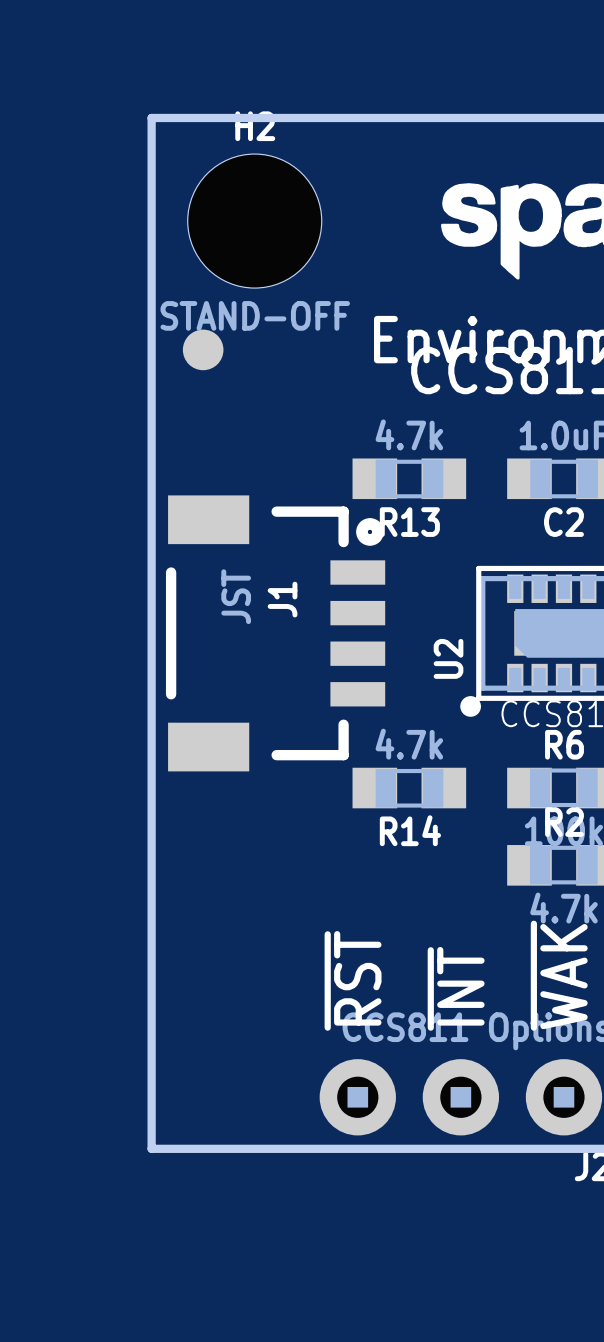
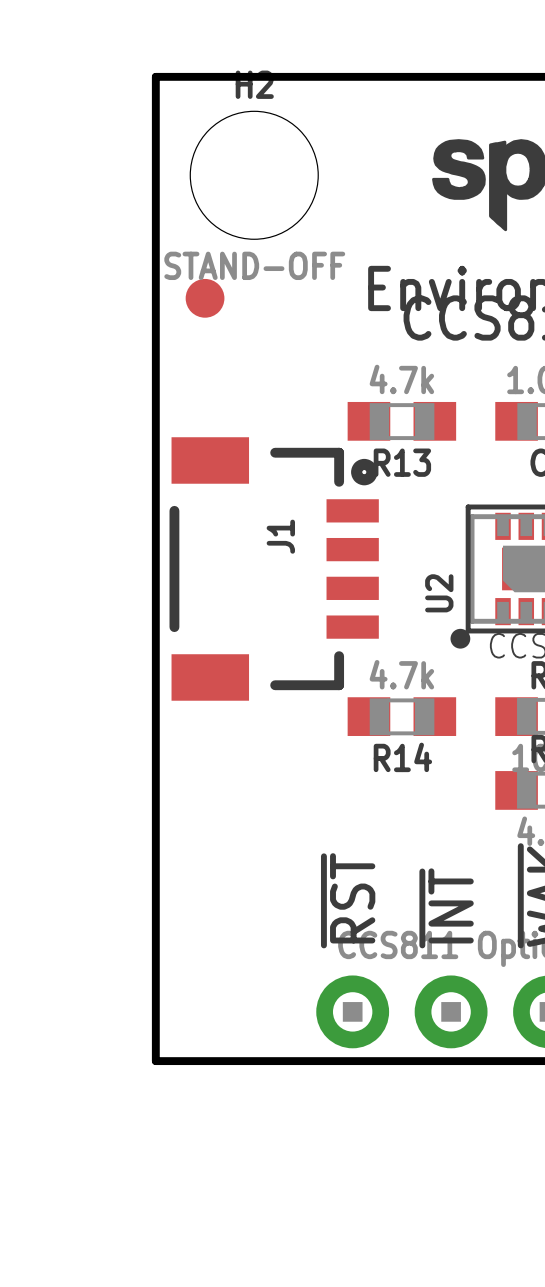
J1 value: JST (236, 596) -> none

